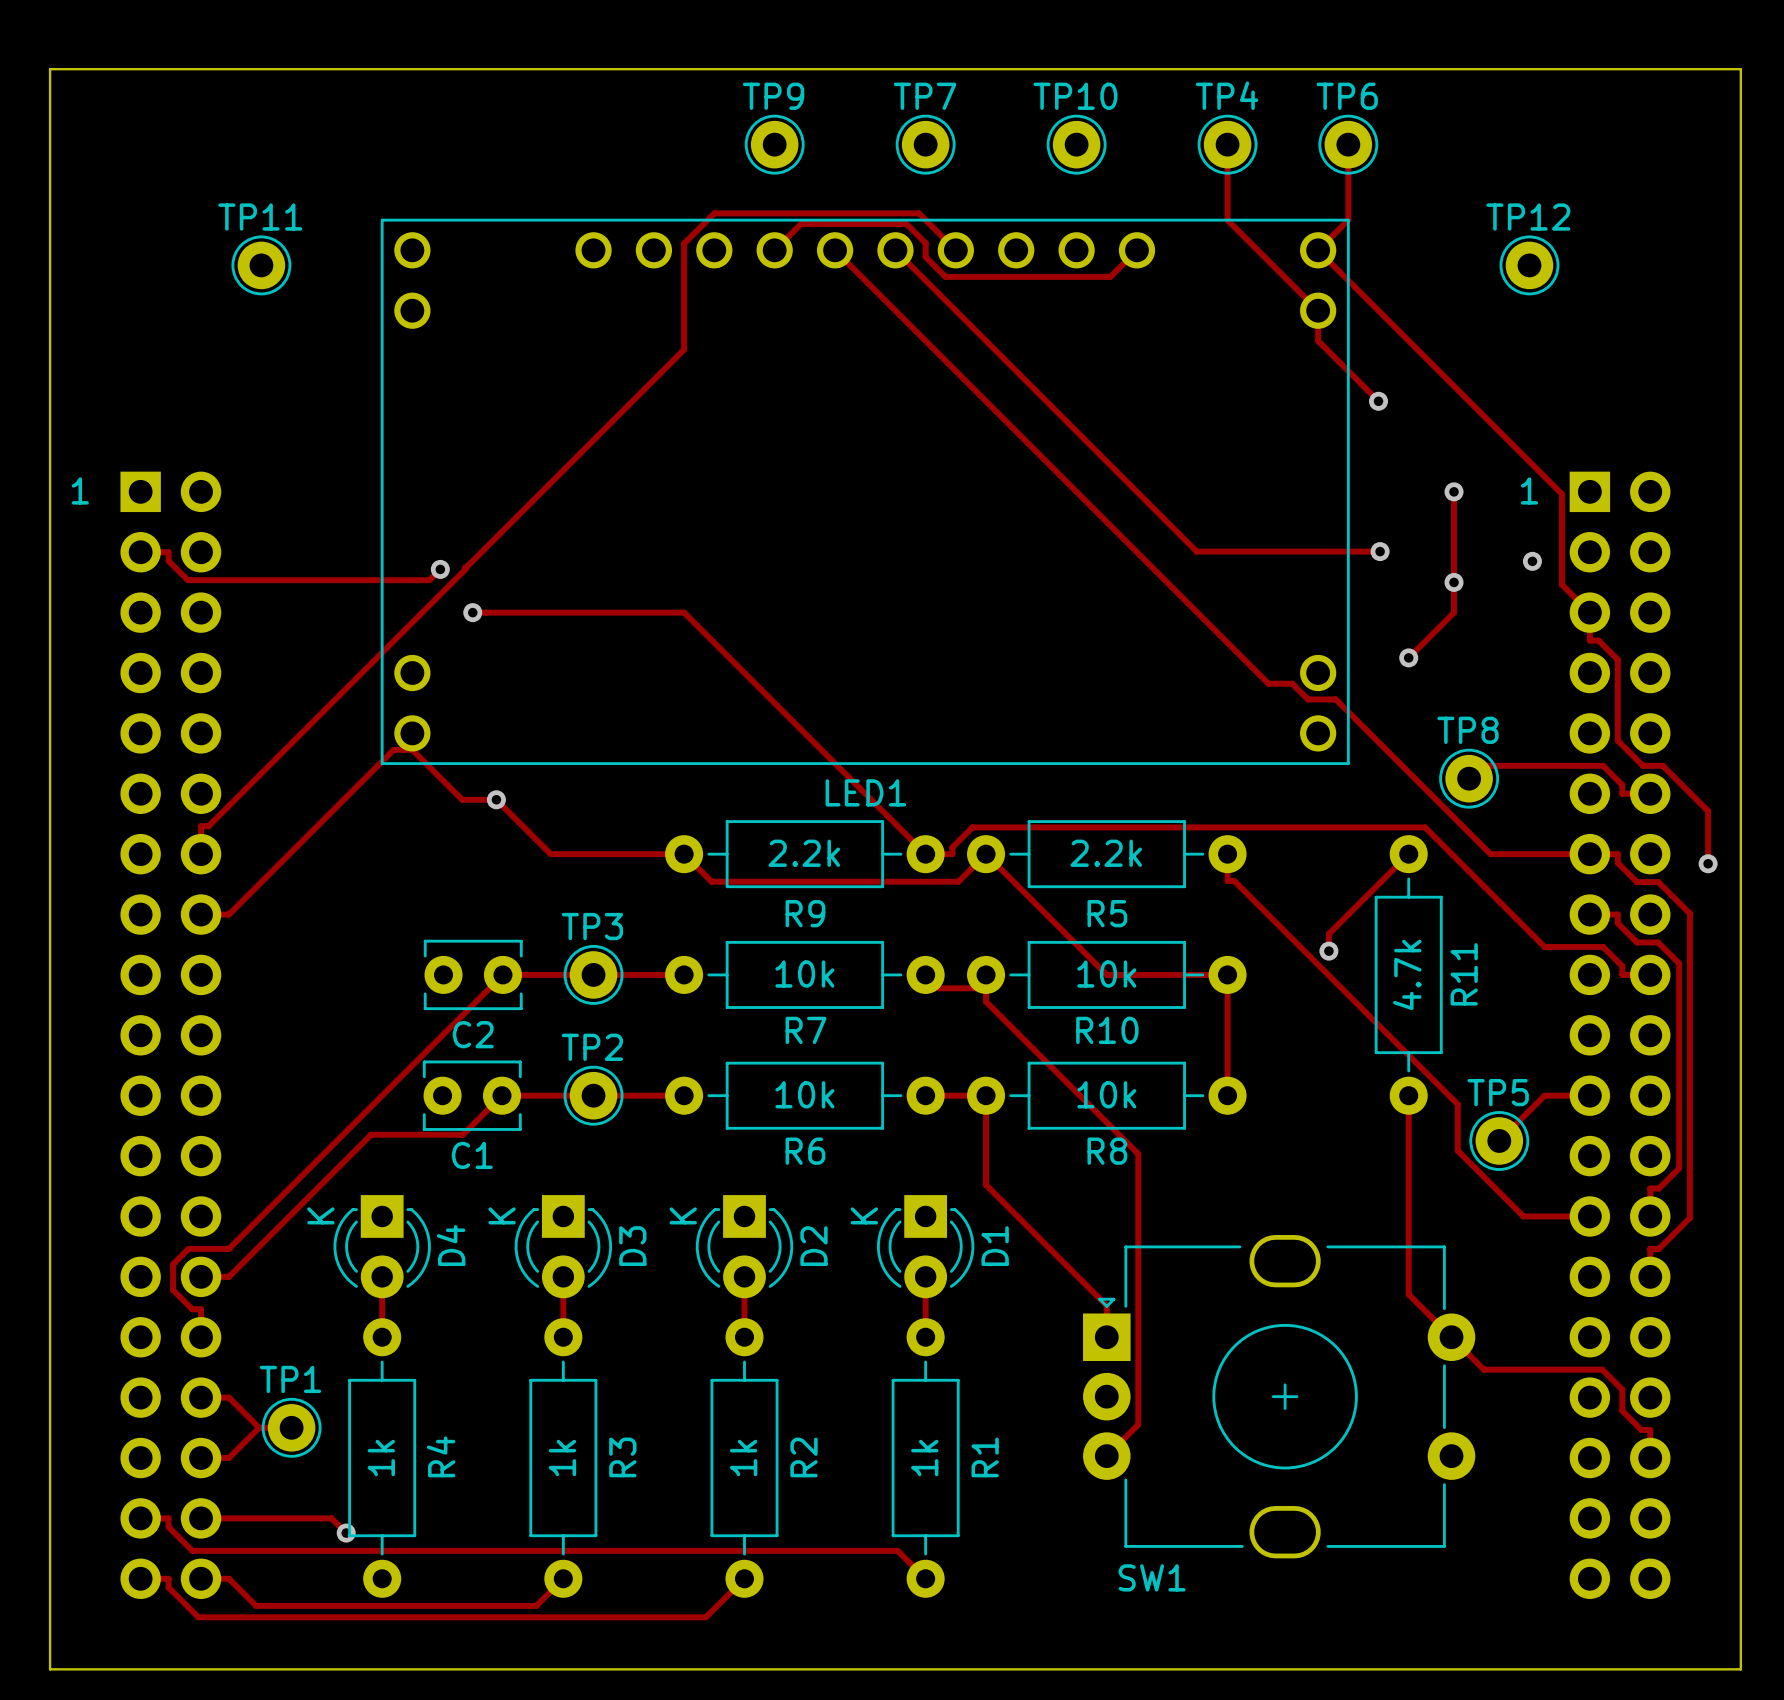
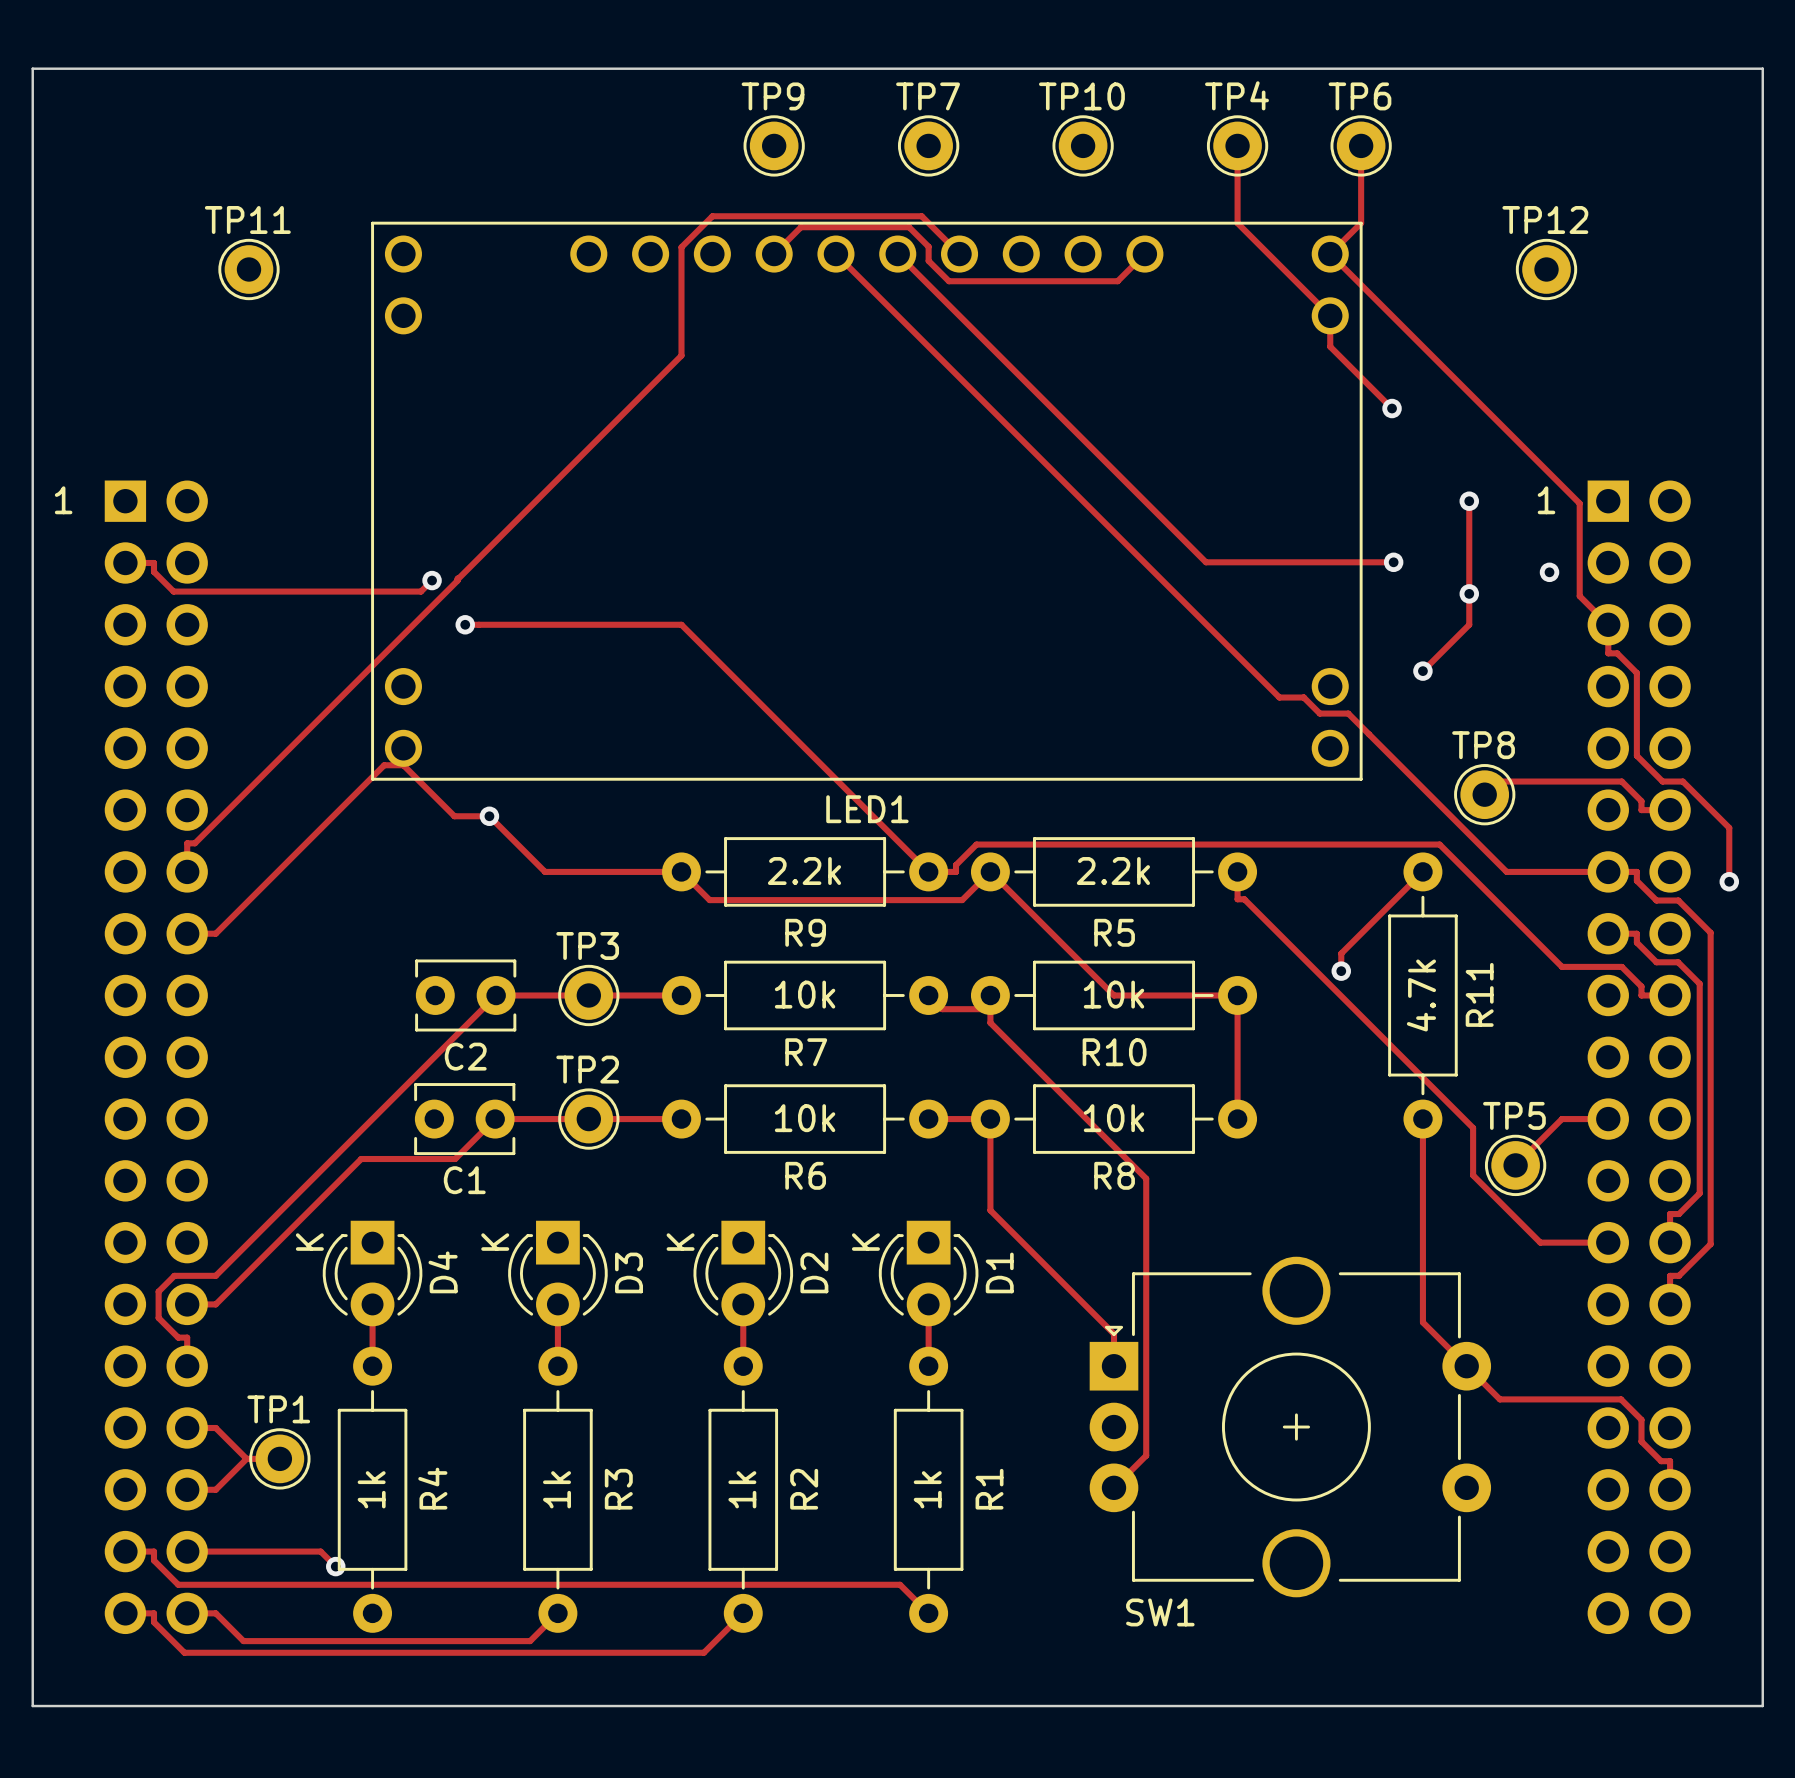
SW1 footprint: [1083, 1235, 1476, 1559] -> [1089, 1256, 1492, 1598]

